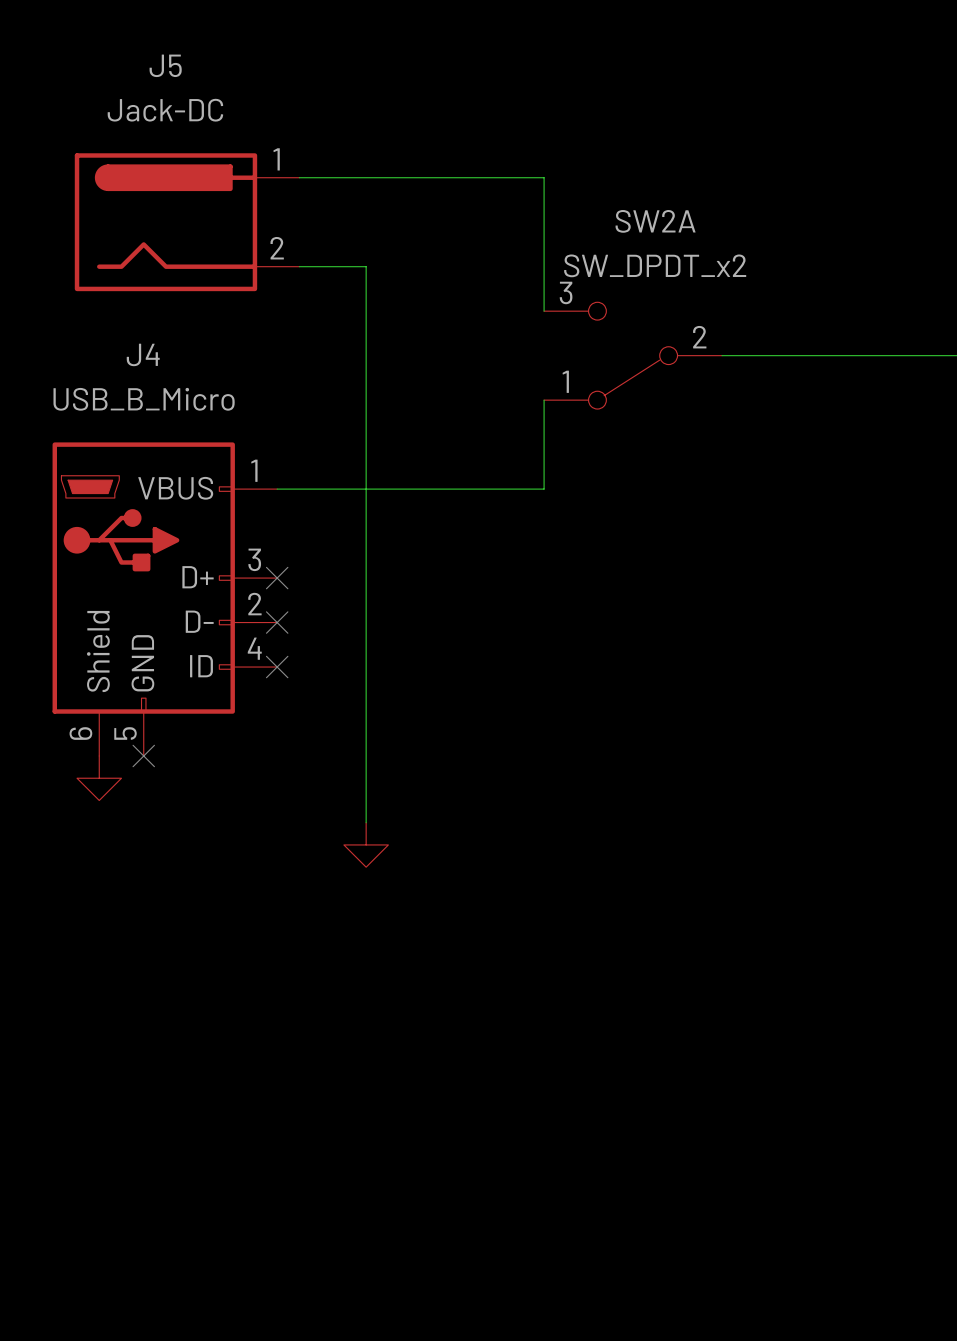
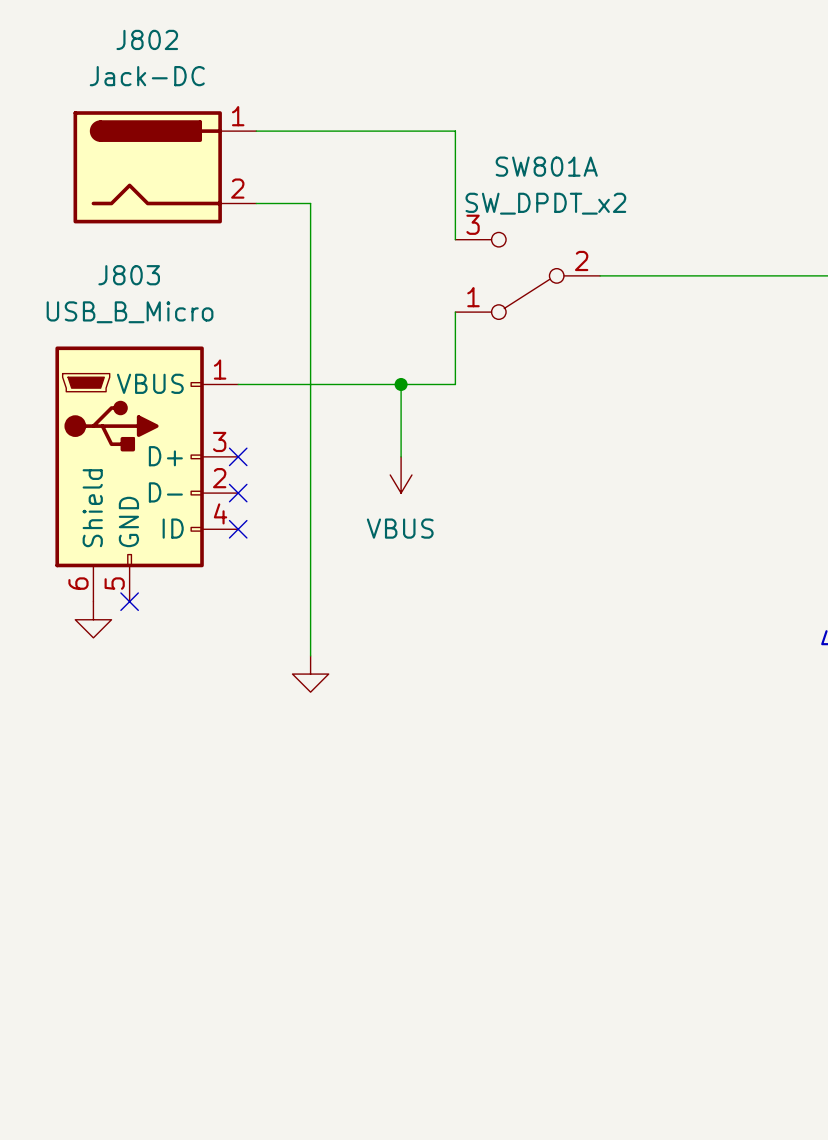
J5 name: J5 (165, 65) -> J802 (147, 39)
SW2A name: SW2A (655, 221) -> SW801A (546, 166)
J4 name: J4 (143, 354) -> J803 (129, 275)
wire: none -> (401, 384) (401, 456)
junction: none -> (401, 384)
power symbol: none -> VBUS (401, 474)

